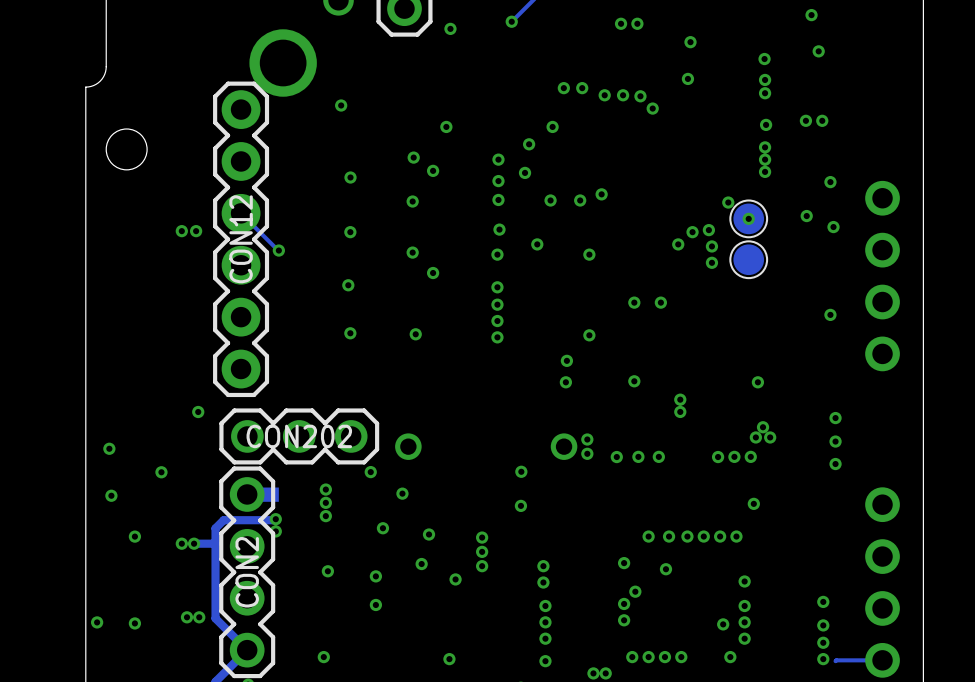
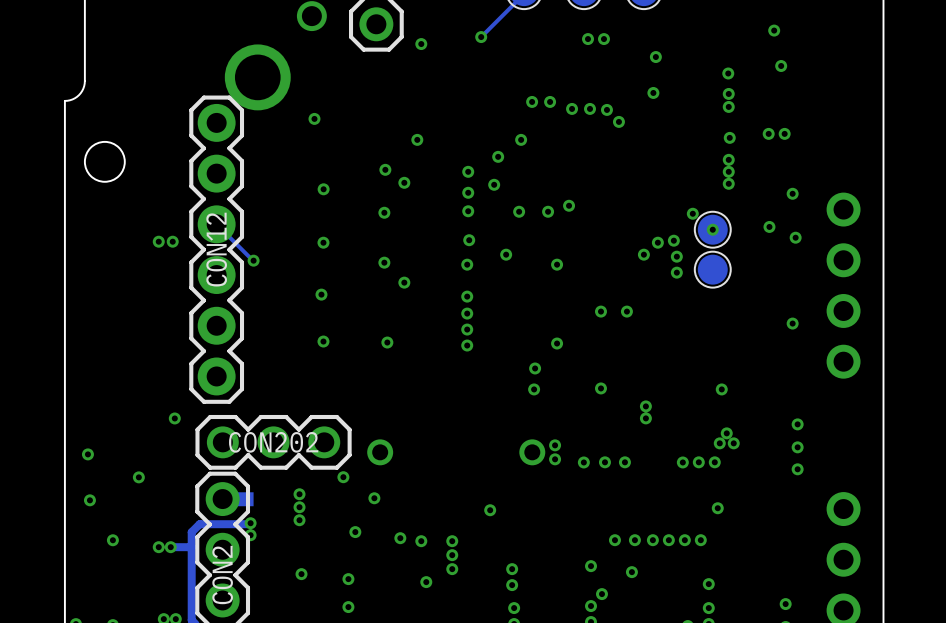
via: (521, 471) -> none
via position: (421, 564) -> (421, 541)

